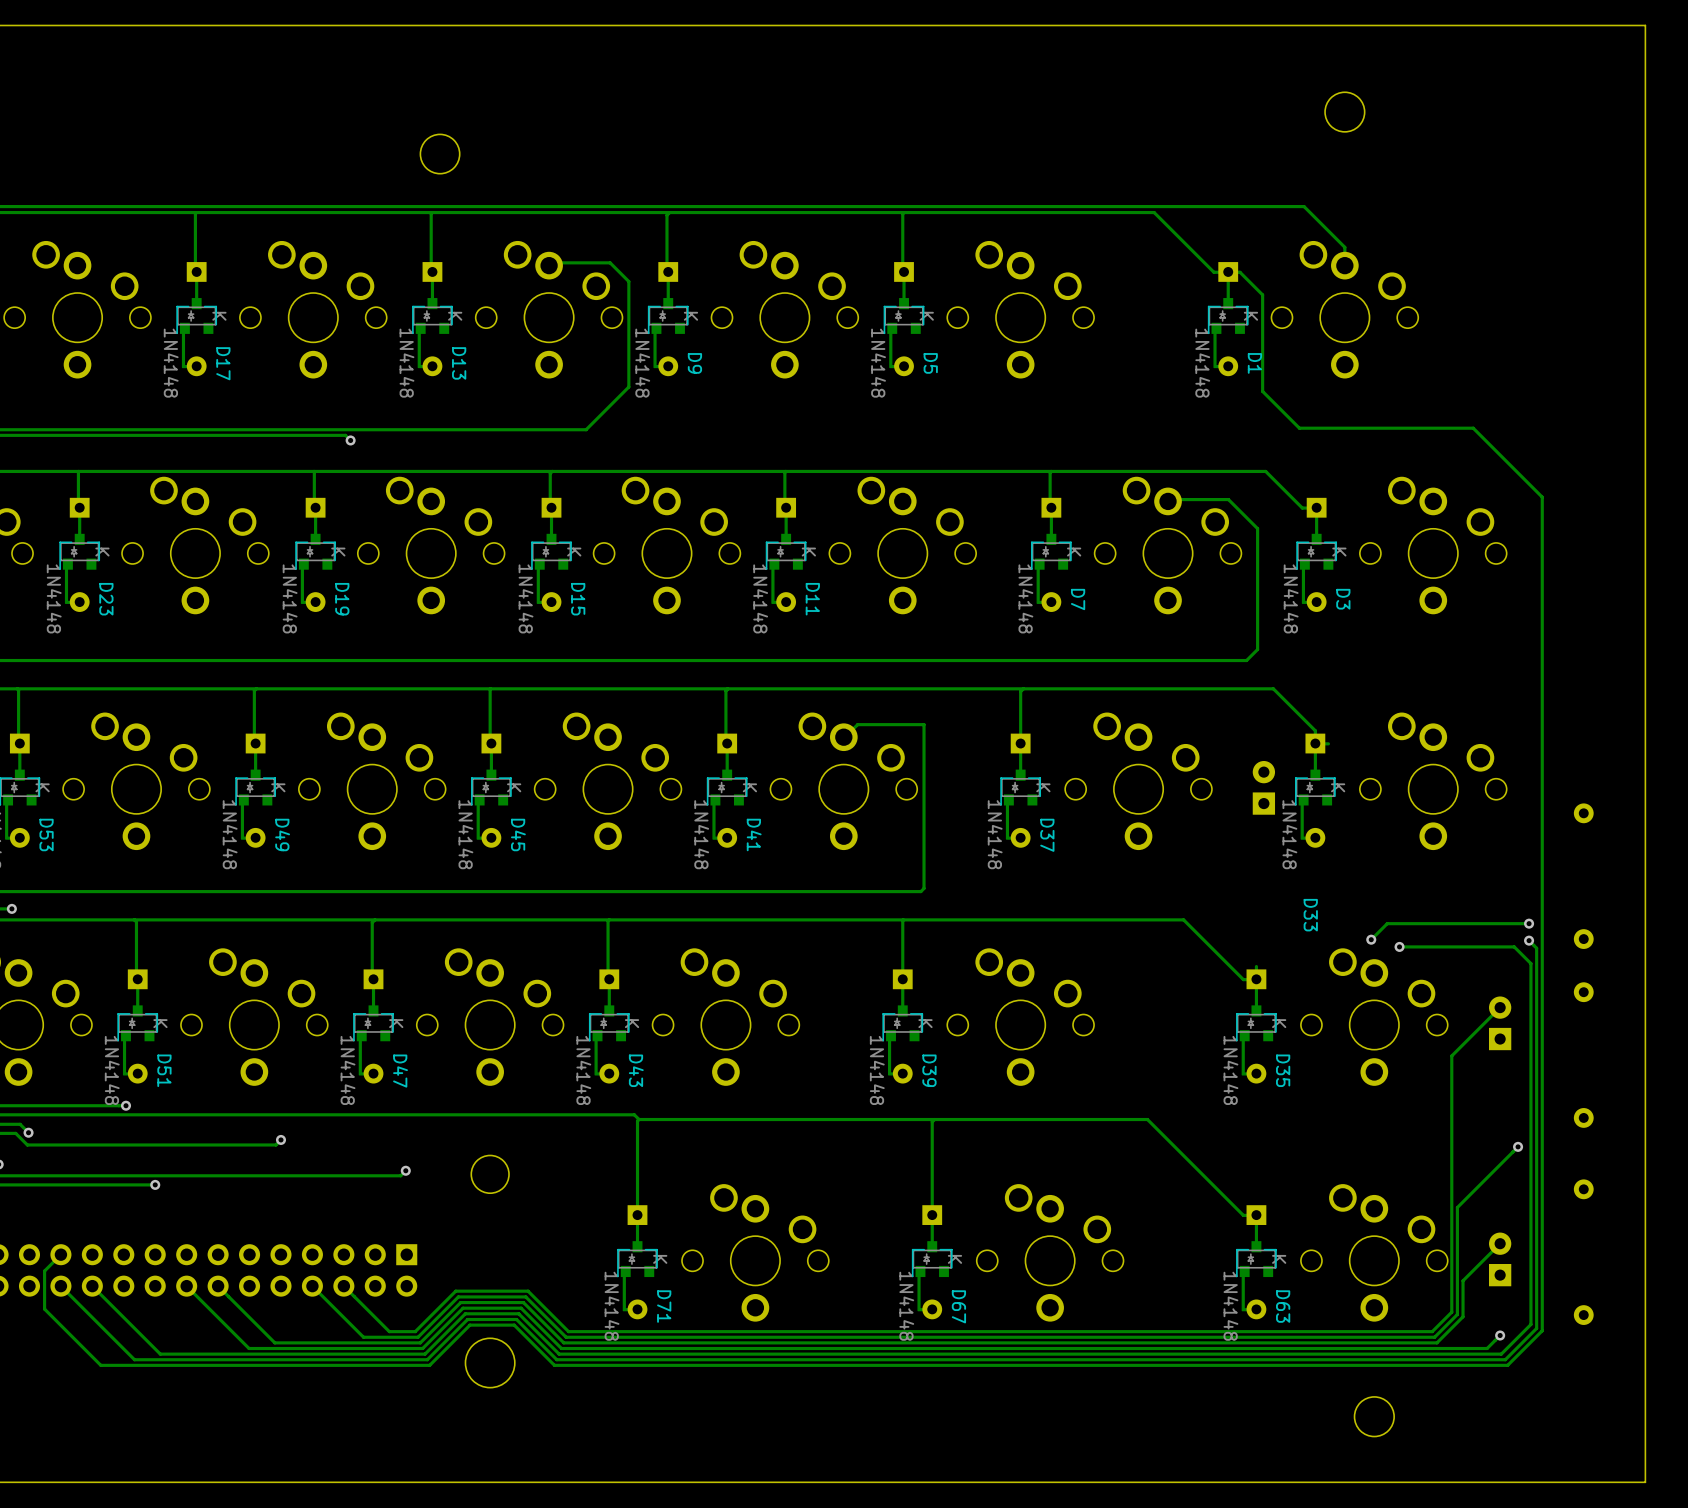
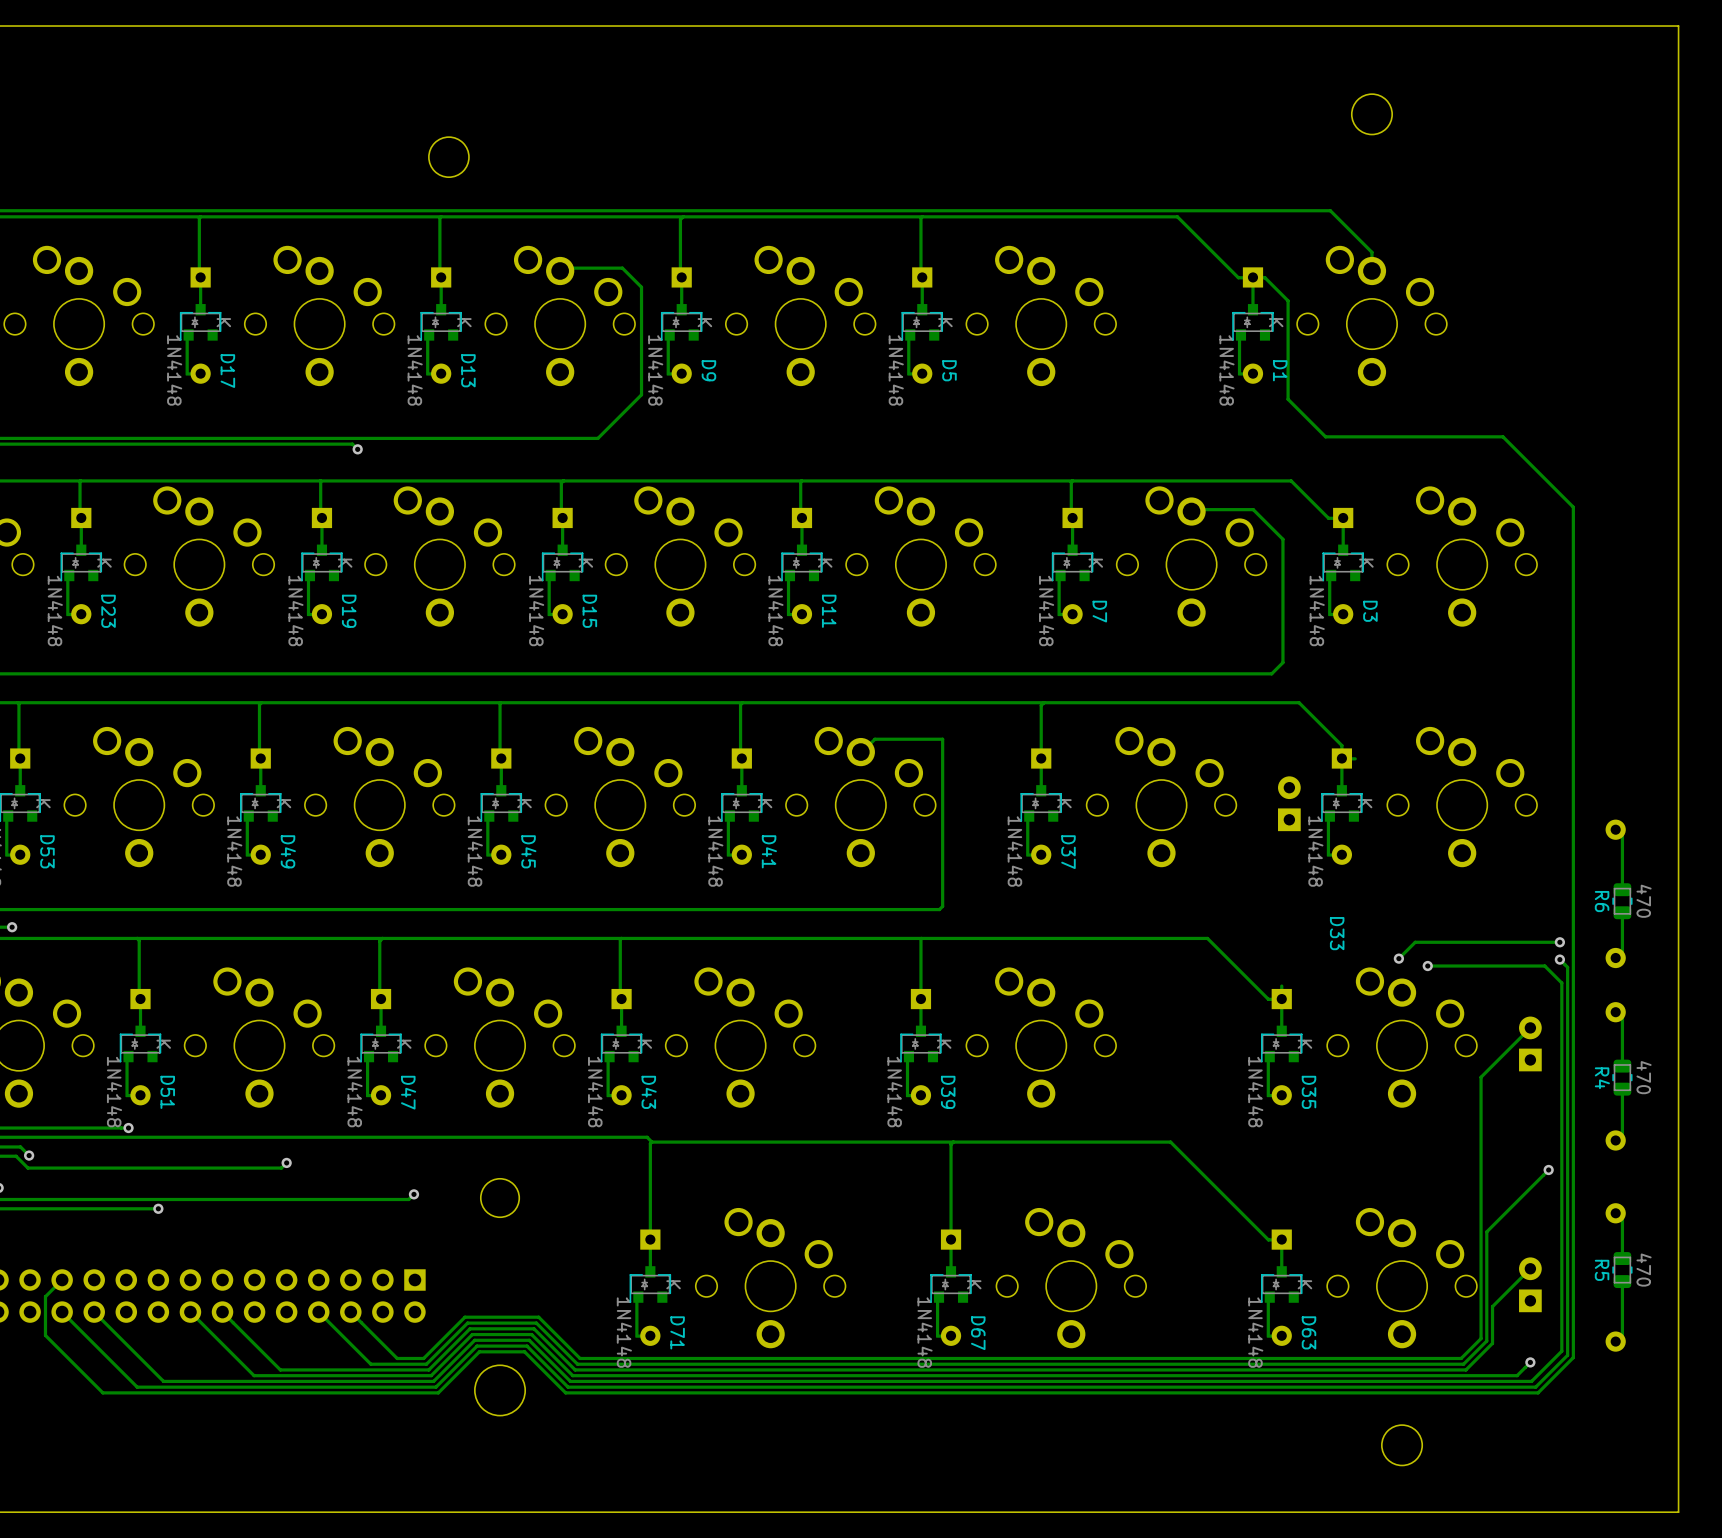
track: none -> (1615, 829) (1622, 836) (1622, 889)
R6: none -> 470 (1622, 901)
track: none -> (1622, 912) (1622, 951) (1615, 958)
track: none -> (1615, 1012) (1622, 1018) (1622, 1066)
R4: none -> 470 (1622, 1077)
track: none -> (1622, 1089) (1622, 1133) (1615, 1140)
track: none -> (1615, 1213) (1622, 1220) (1622, 1258)
R5: none -> 470 (1622, 1270)
track: none -> (1622, 1281) (1622, 1334) (1615, 1341)

